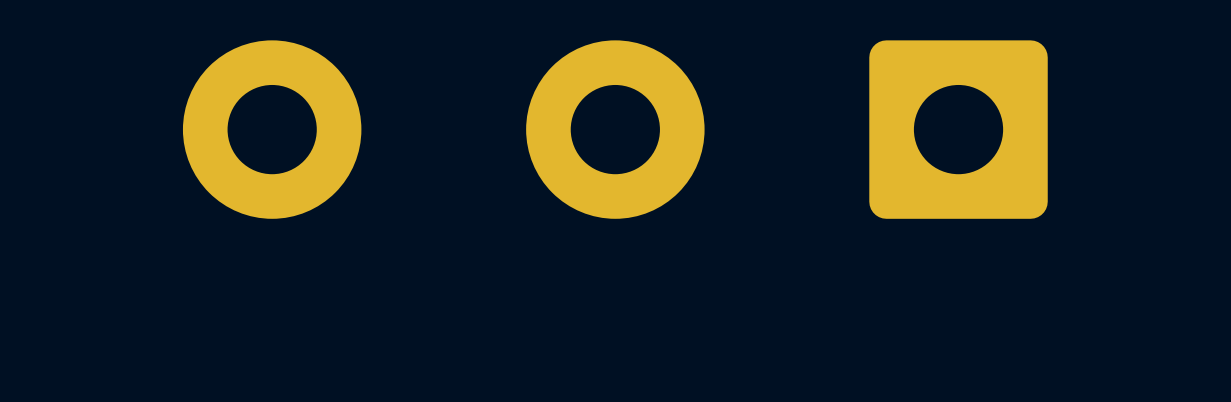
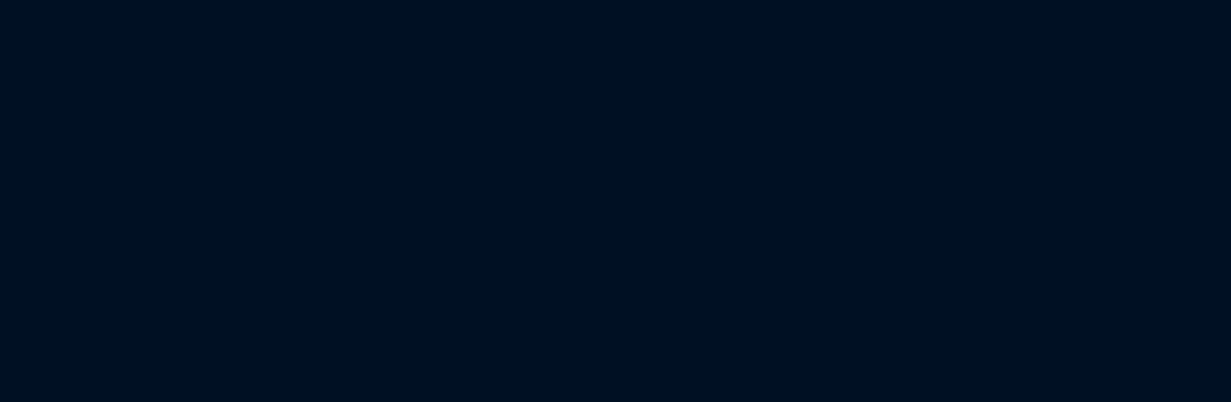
part: (615, 129) -> none

